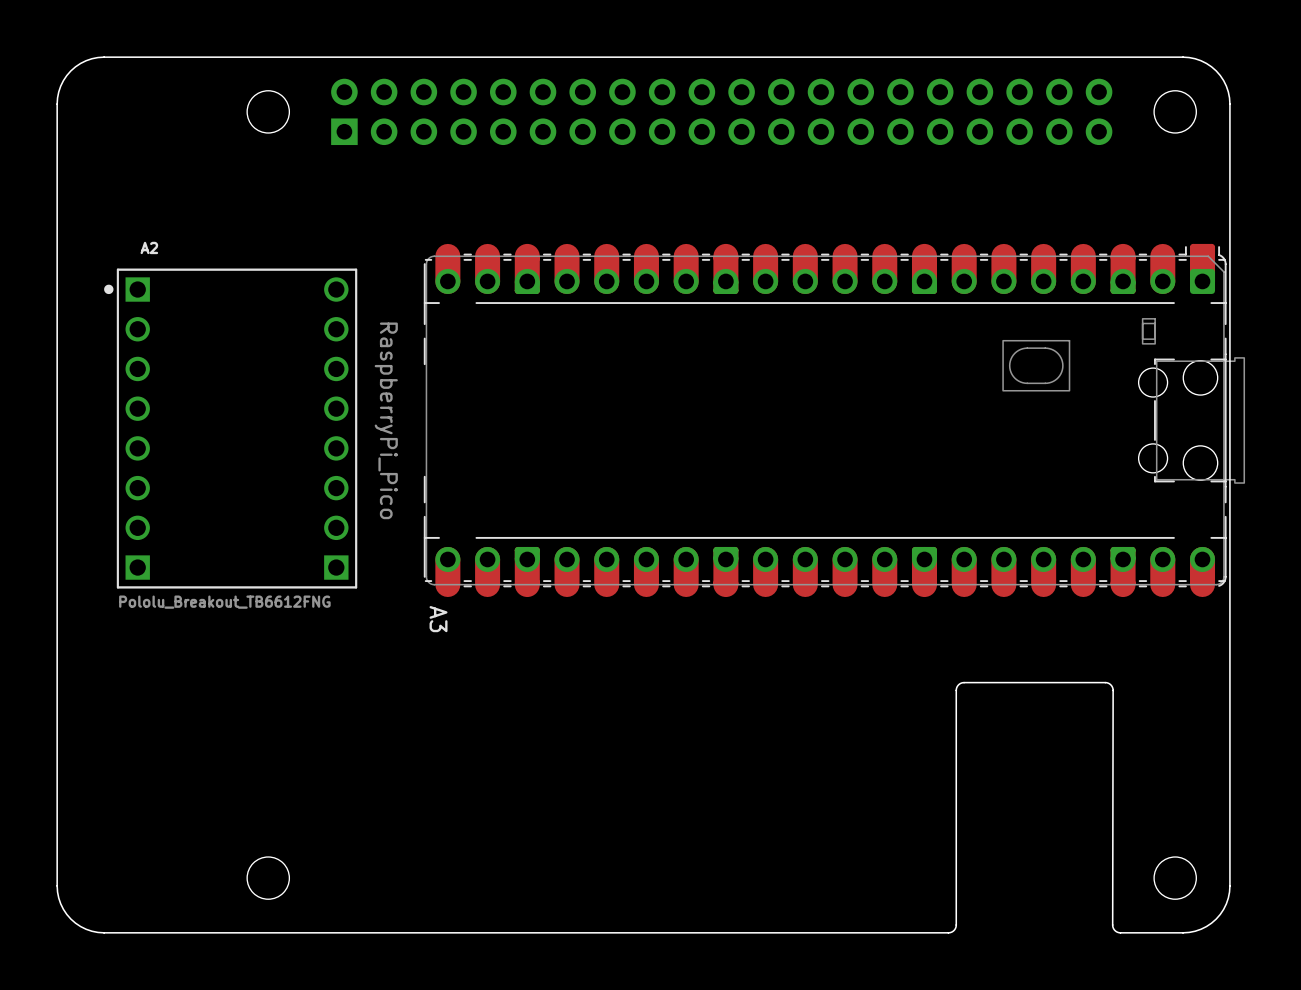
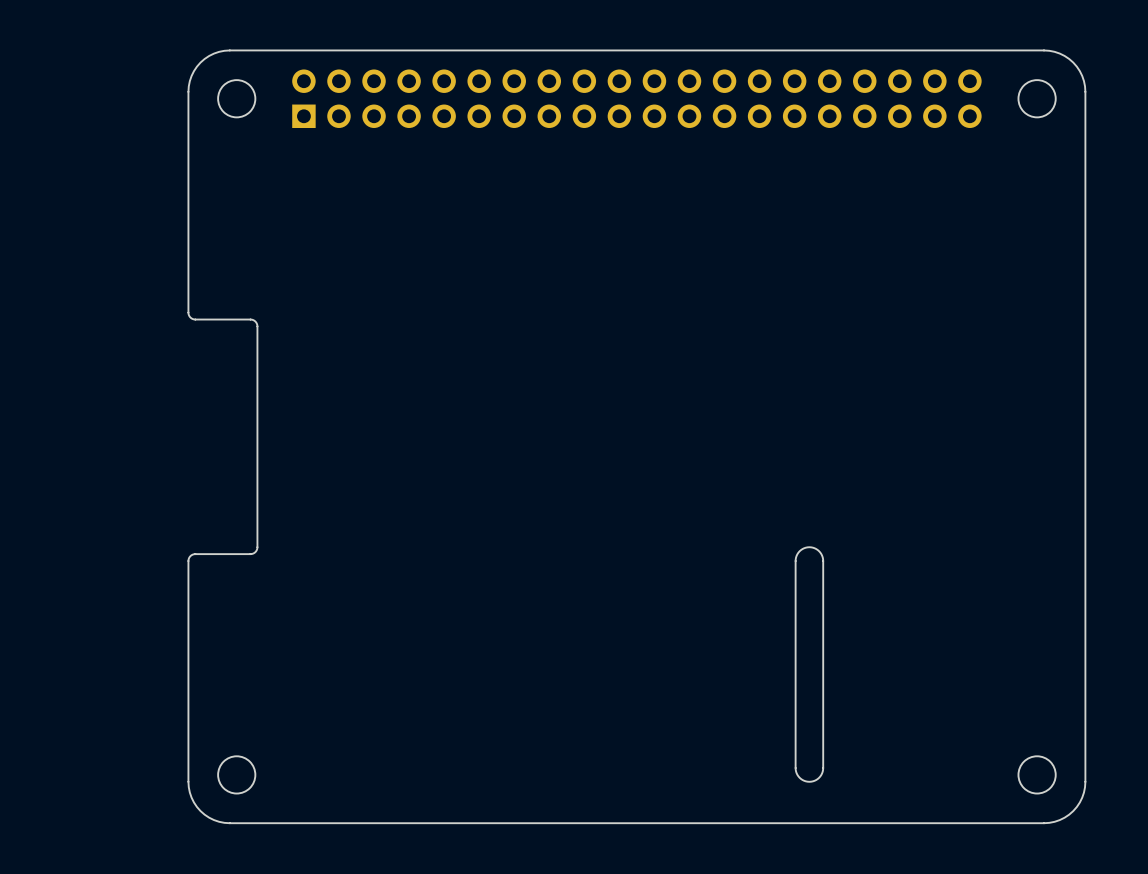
board edge: (260, 57) (91, 58) (75, 66) (66, 75) (60, 86) (57, 104) (57, 885) (58, 898) (63, 909) (70, 919) (80, 926) (97, 932) (260, 932) -> (229, 50) (213, 53) (200, 62) (191, 75) (188, 91) (188, 314) (194, 319) (251, 319) (256, 322) (257, 326) (257, 549) (251, 554) (194, 554) (190, 556) (188, 561) (188, 787) (193, 802) (204, 814) (219, 821) (229, 823)
A3: RaspberryPi_Pico (834, 420) -> none
A2: Pololu_Breakout_TB6612FNG (230, 428) -> none
board edge: none -> (795, 561) (795, 769) (801, 778) (811, 781) (820, 776) (823, 768) (823, 559) (819, 551) (809, 547) (799, 551) (795, 561)
board edge: (948, 932) (953, 930) (956, 925) (956, 690) (958, 684) (964, 682) (1105, 682) (1111, 686) (1112, 925) (1114, 930) (1120, 932) -> (836, 823) (988, 823)

